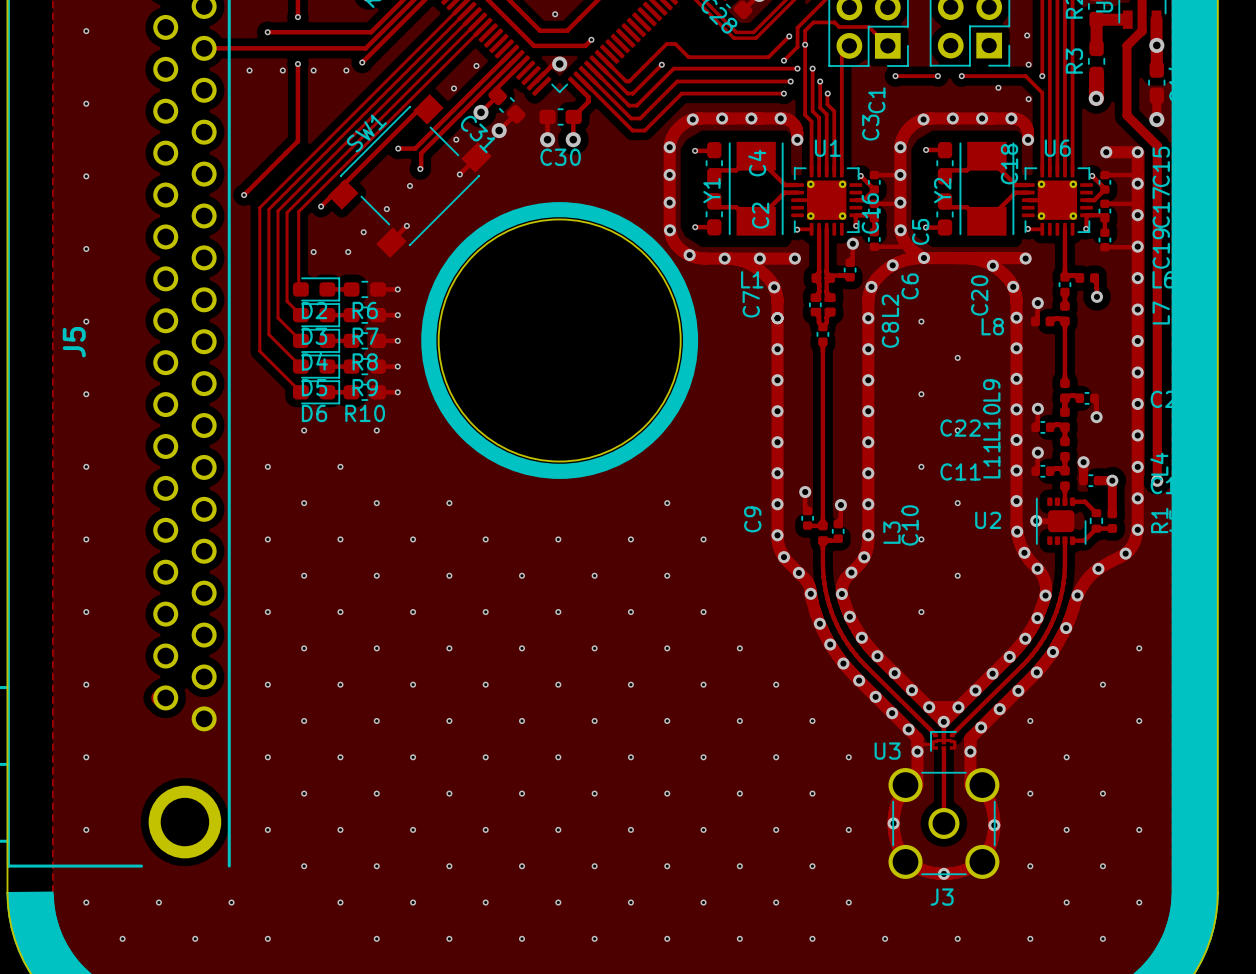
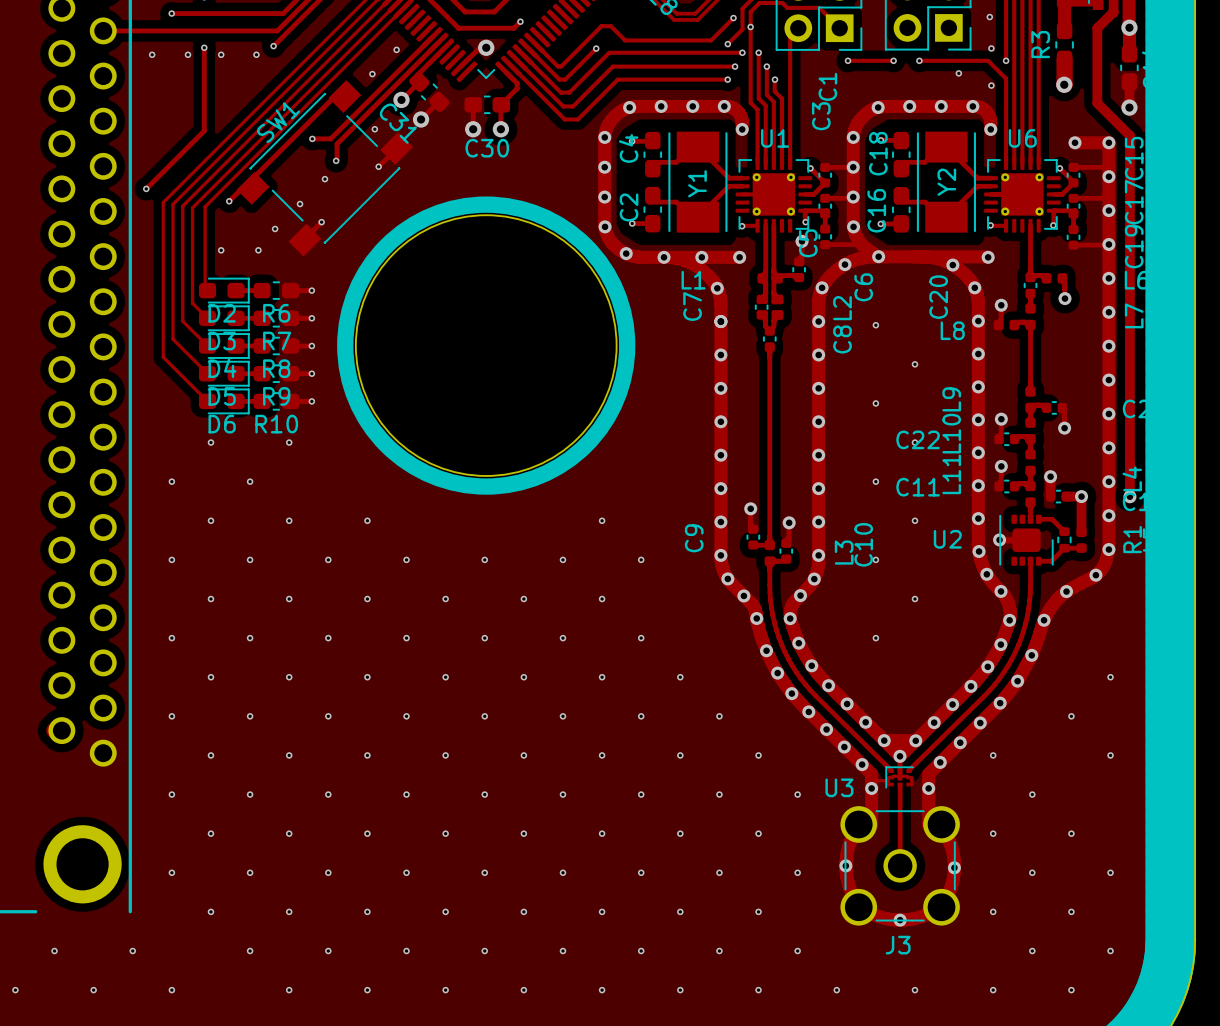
C4 name position: C4 (757, 163) -> C4 (628, 148)
C18 name position: C18 (1009, 164) -> C18 (878, 153)
Y1 name position: Y1 (711, 190) -> Y1 (697, 183)
Y2 name position: Y2 (942, 190) -> Y2 (946, 182)
C16 name position: C16 (870, 213) -> C16 (876, 210)
C2 name position: C2 (760, 215) -> C2 (629, 207)
C5 name position: C5 (920, 231) -> C5 (808, 243)

